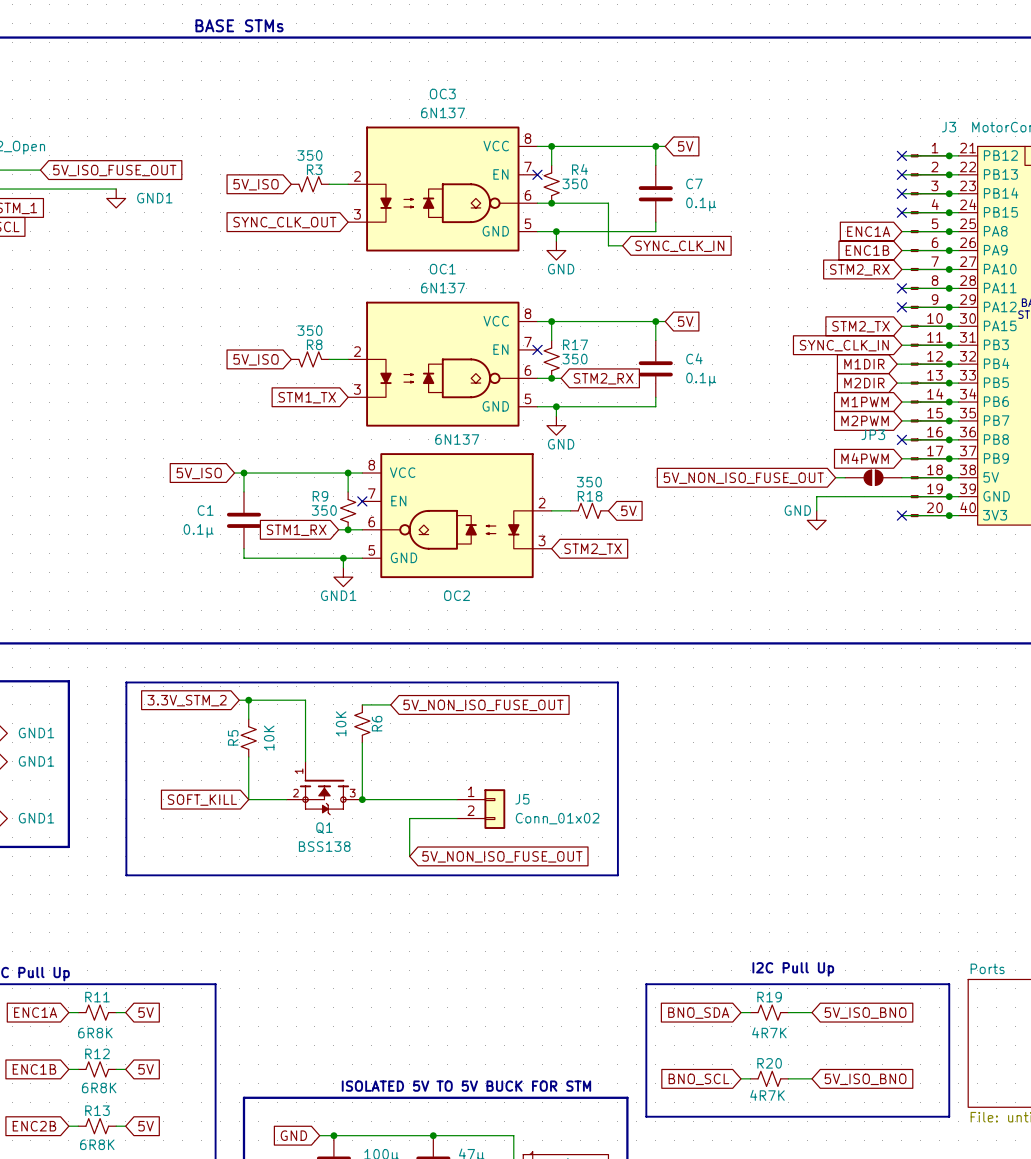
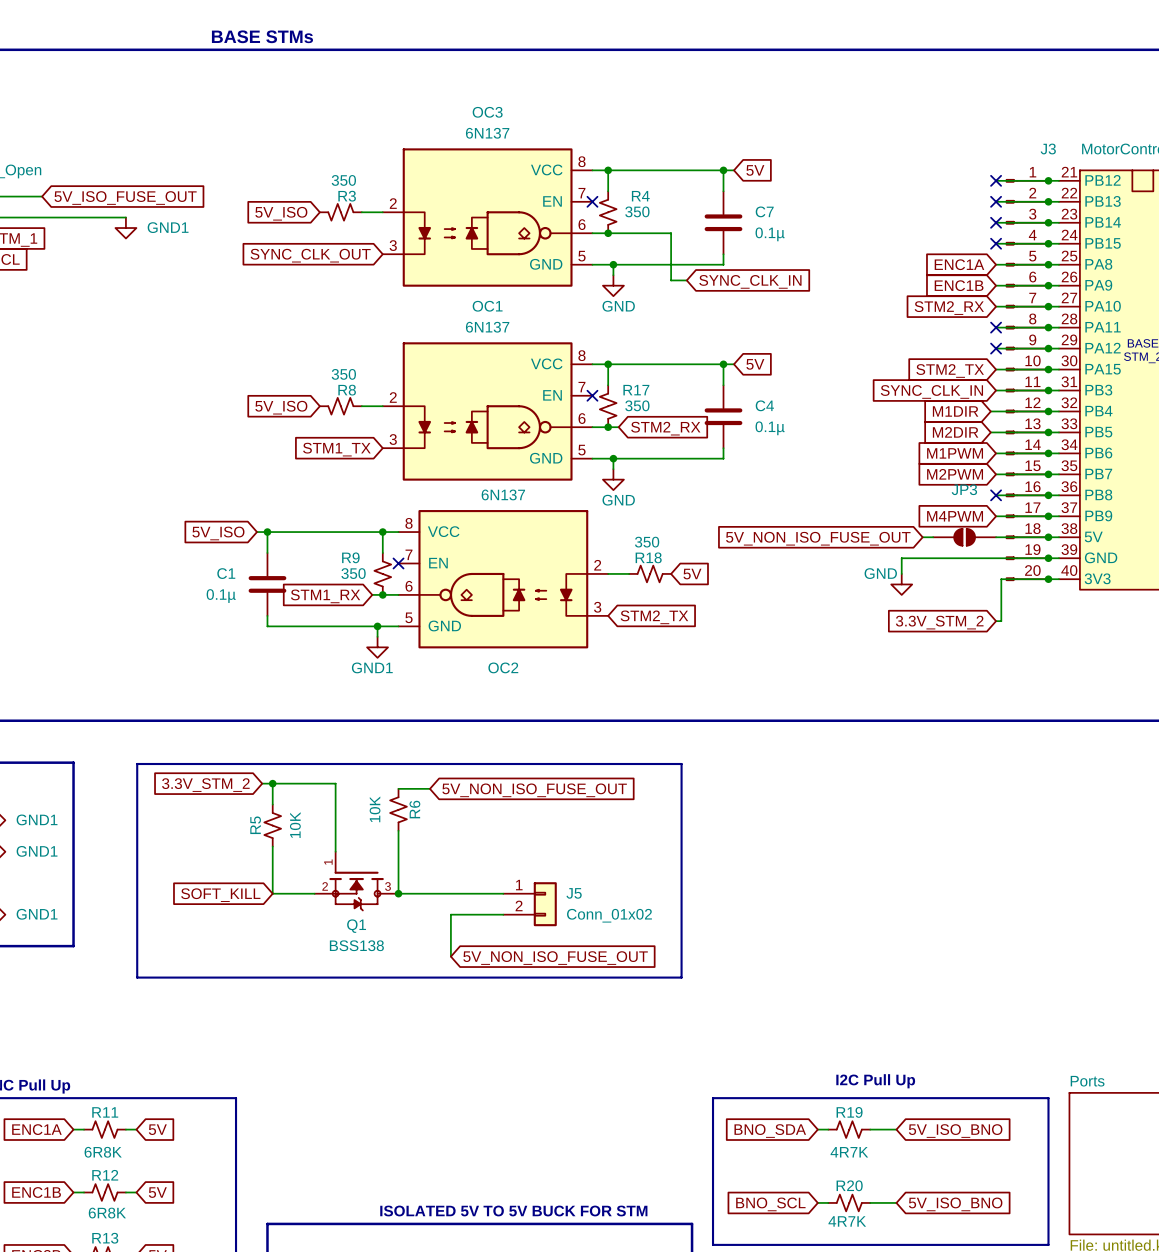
wire: (901, 515) (906, 515) -> (996, 621) (1001, 621) (1001, 579)
no-connect mark: (901, 515) -> none
global label: none -> 3.3V_STM_2 (939, 622)

